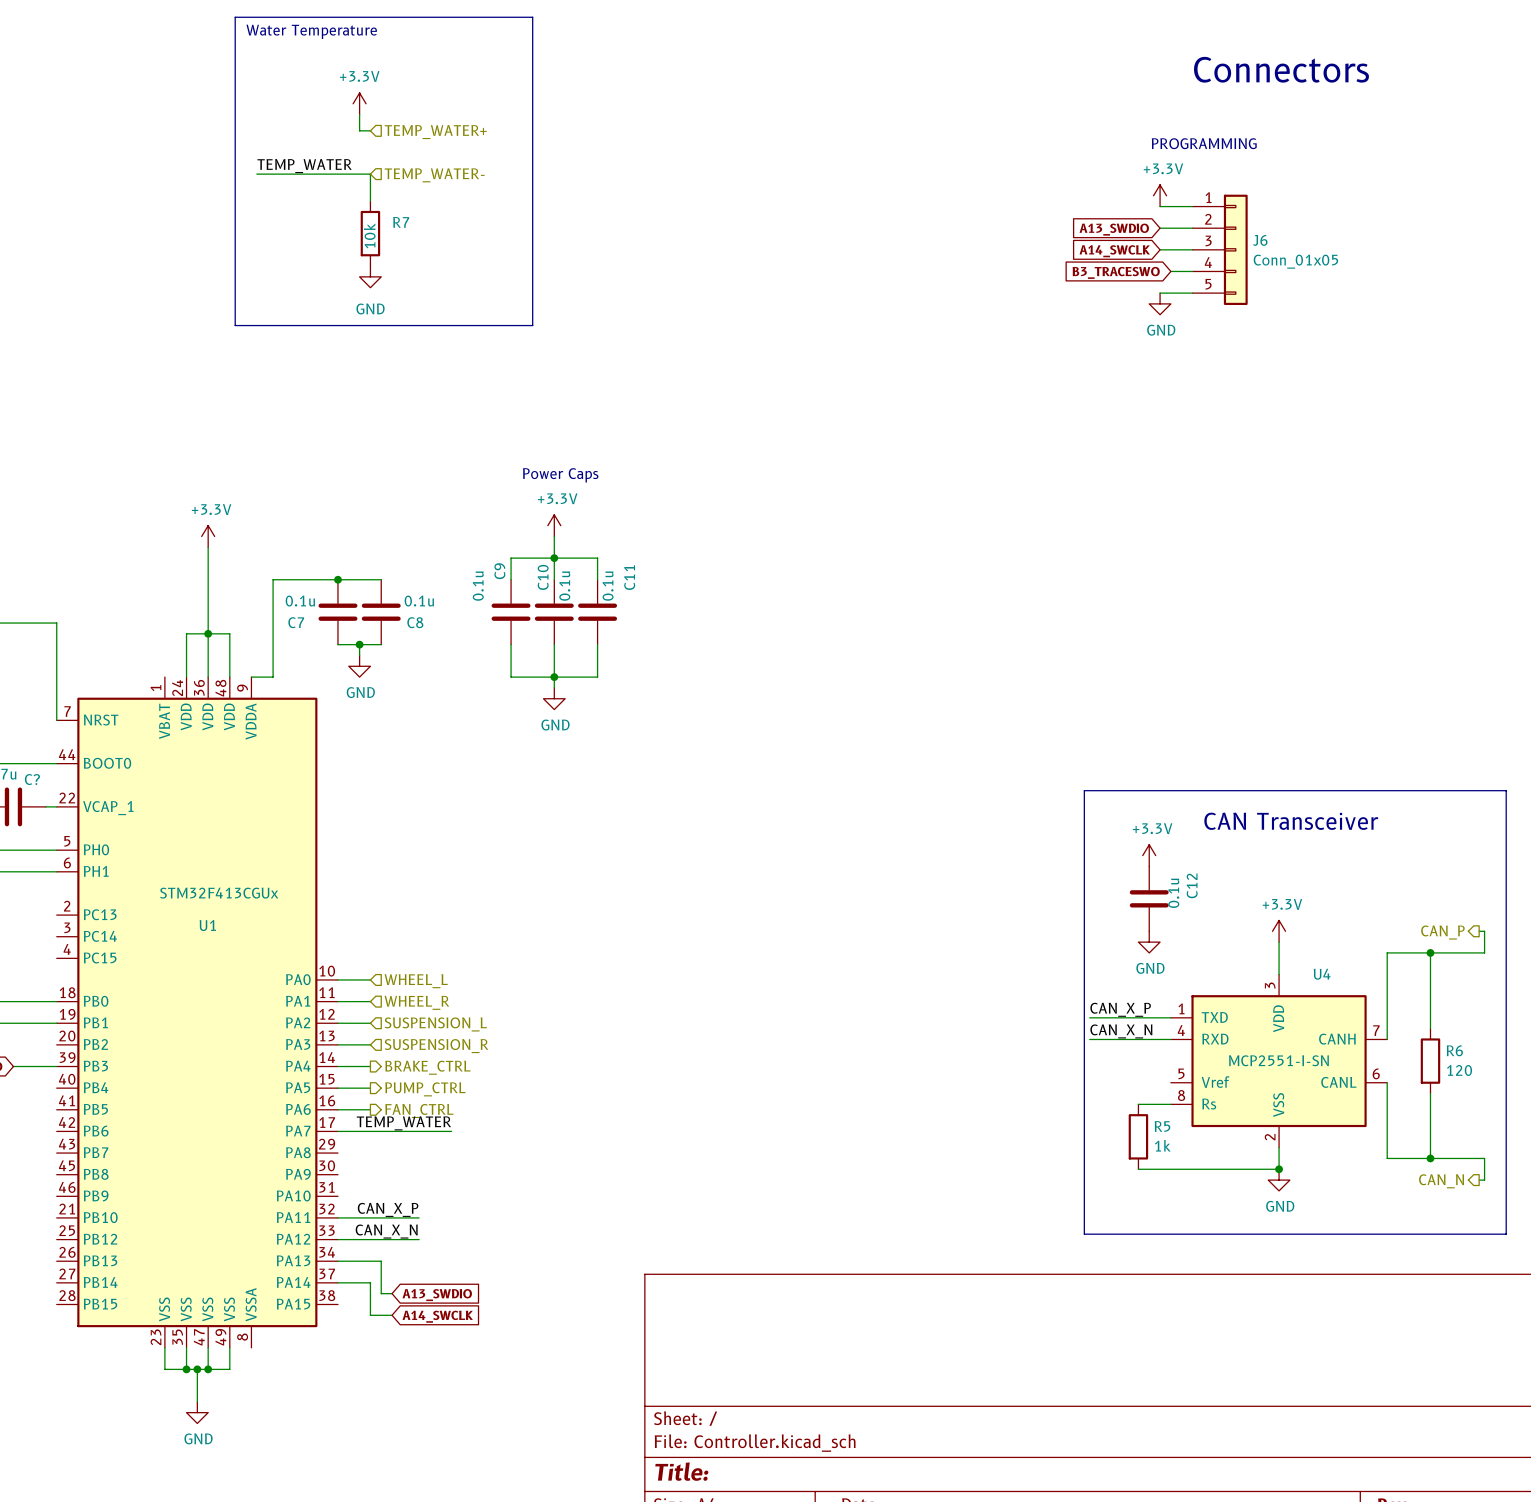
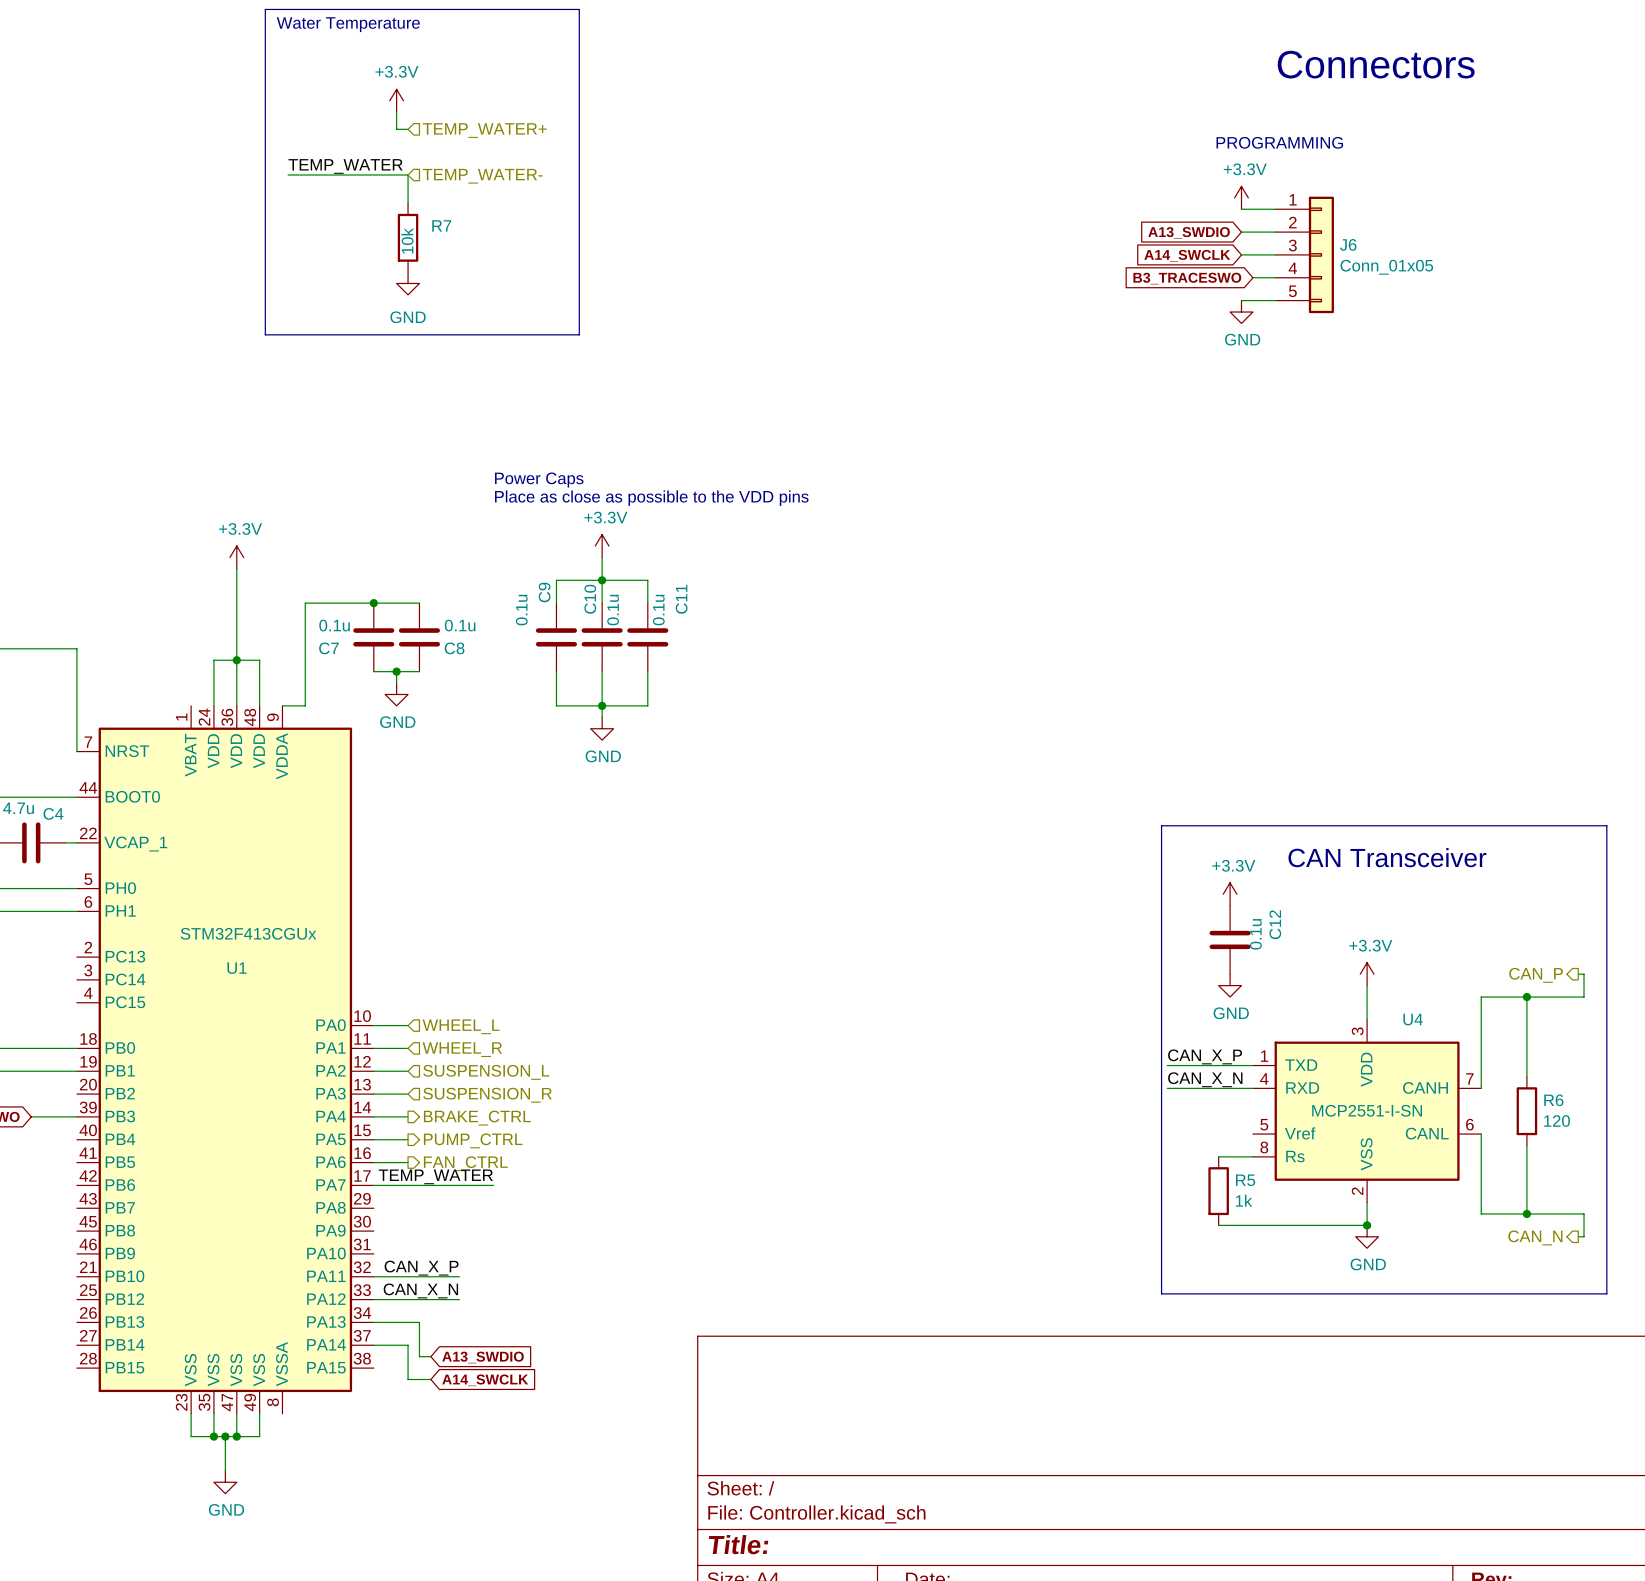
text position: Power Caps (560, 475) -> Power Caps (539, 480)
text: none -> Place as close as possible to the VDD pins (651, 498)
C? name: C? (32, 779) -> C4 (53, 813)

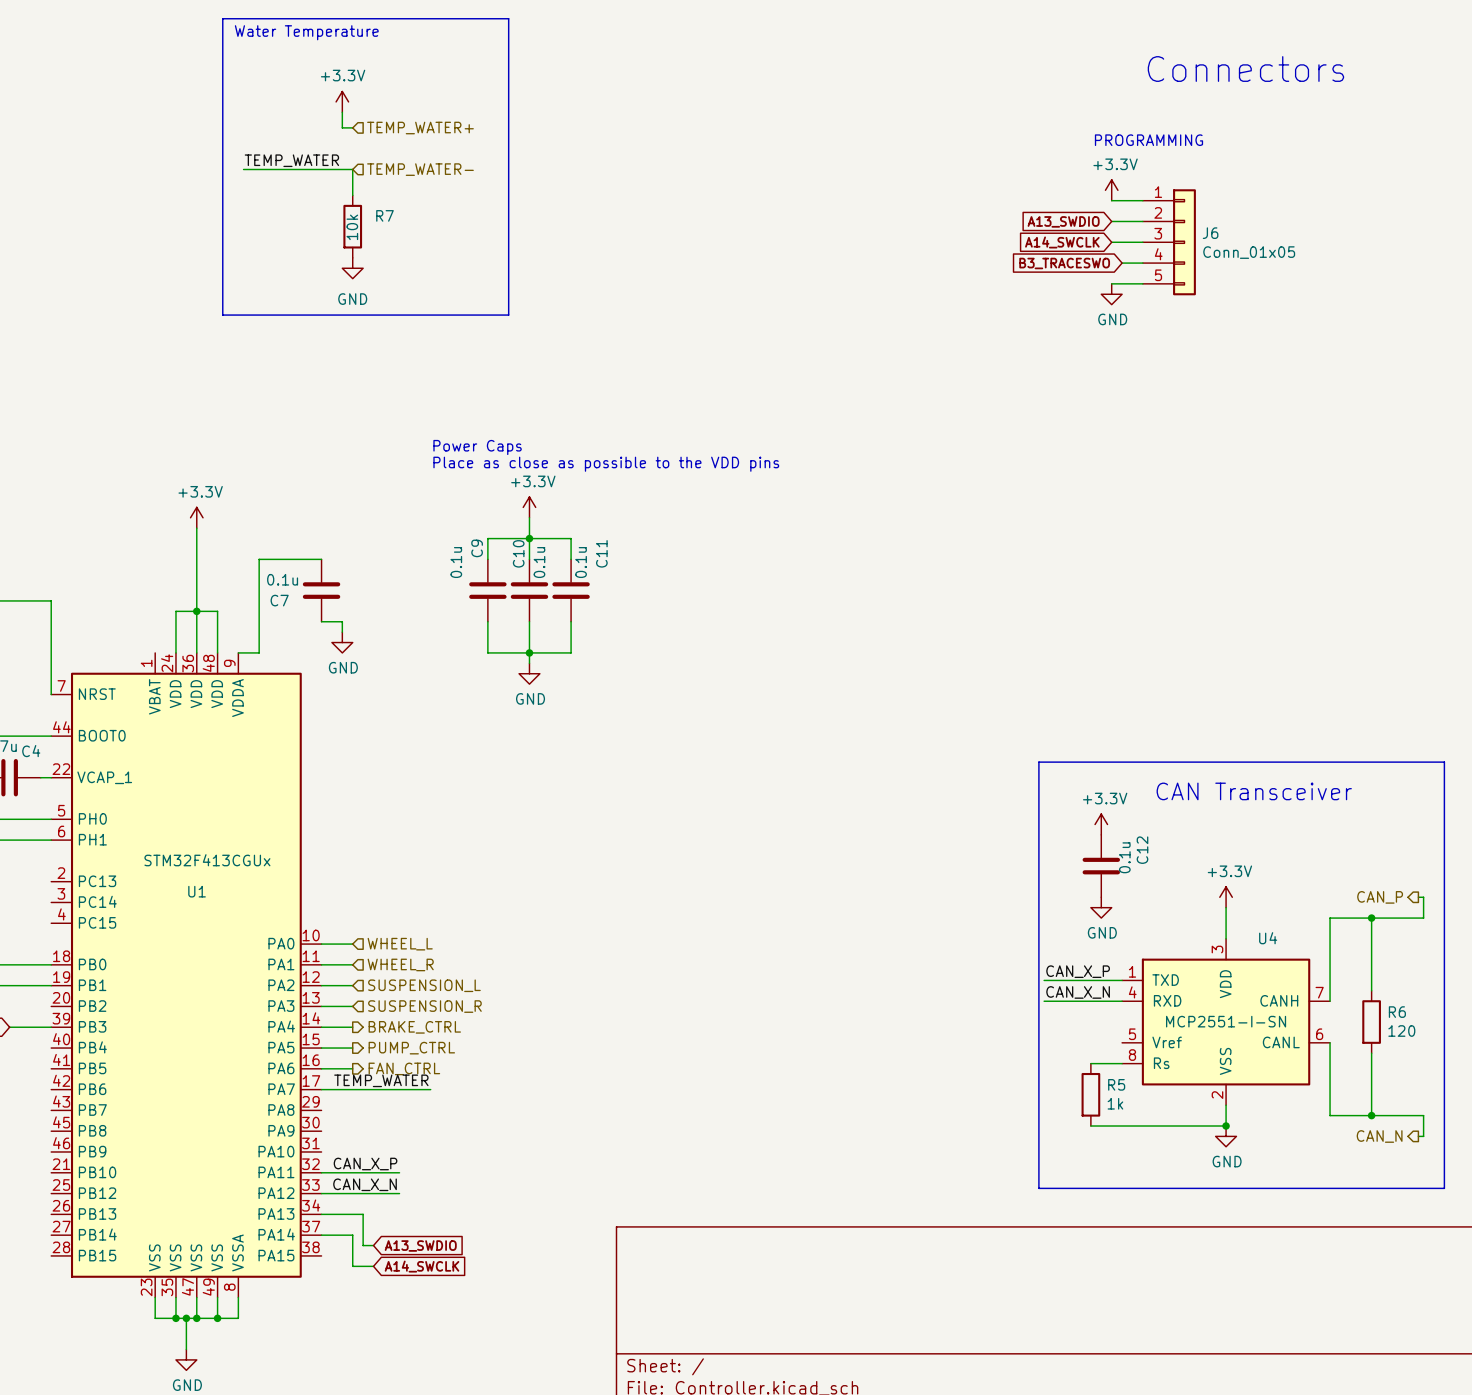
wire: (373, 603) (419, 603) -> none
junction: (373, 603) -> none
C8: 0.1u (419, 637) -> none
wire: (396, 671) (419, 671) -> none
junction: (396, 671) -> none
wire: none -> (238, 1297) (238, 1318) (217, 1318)
junction: none -> (217, 1318)

